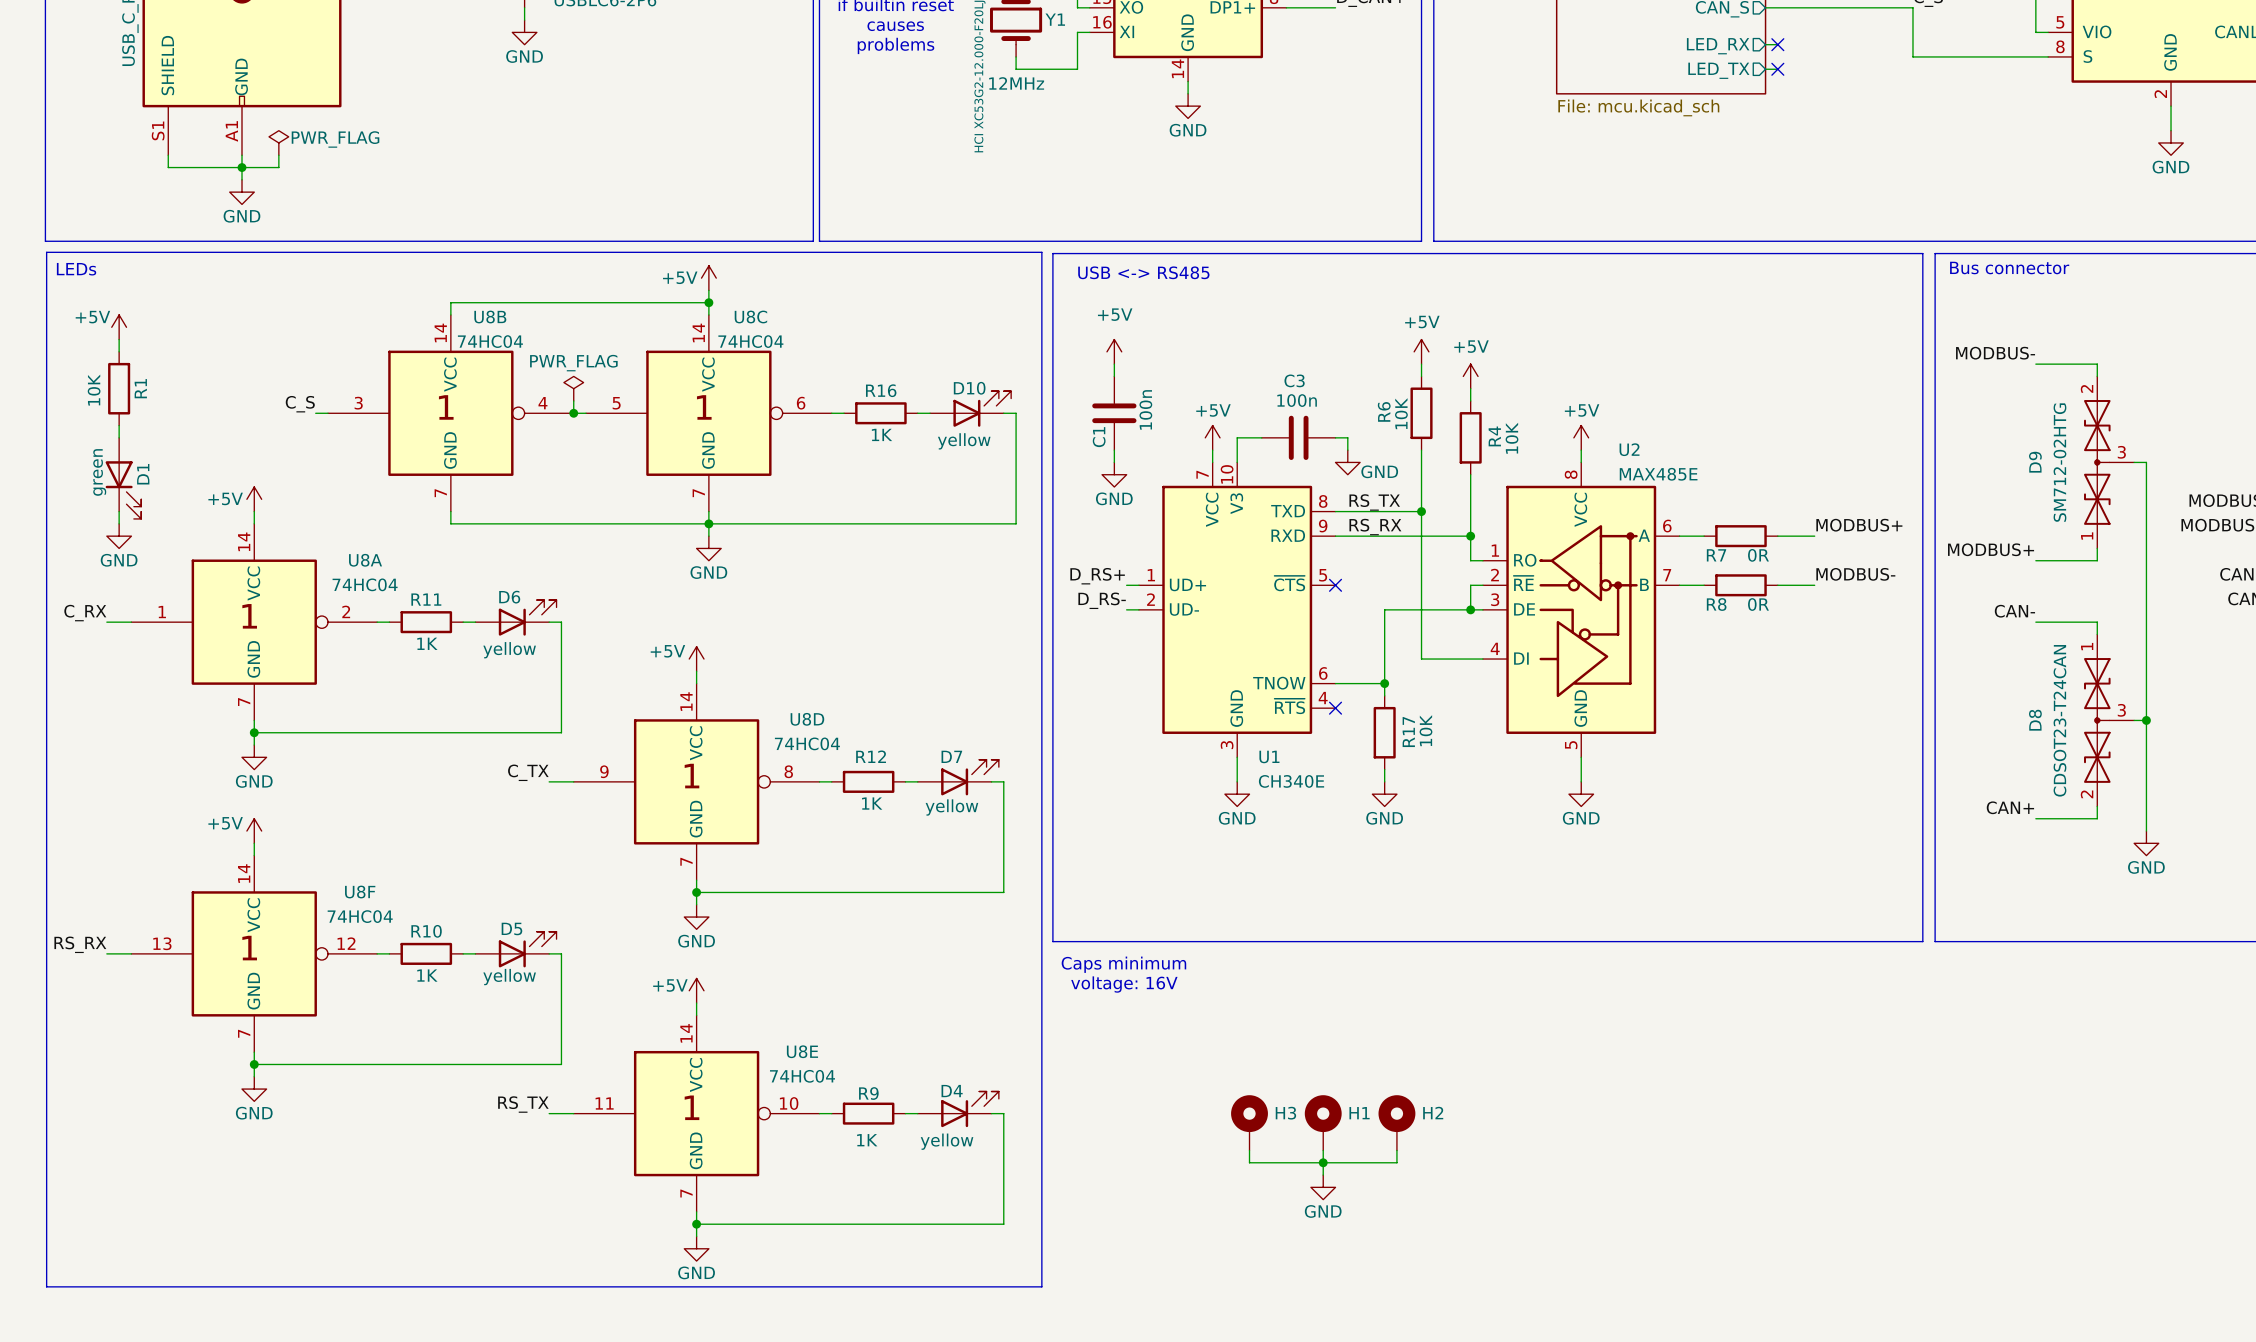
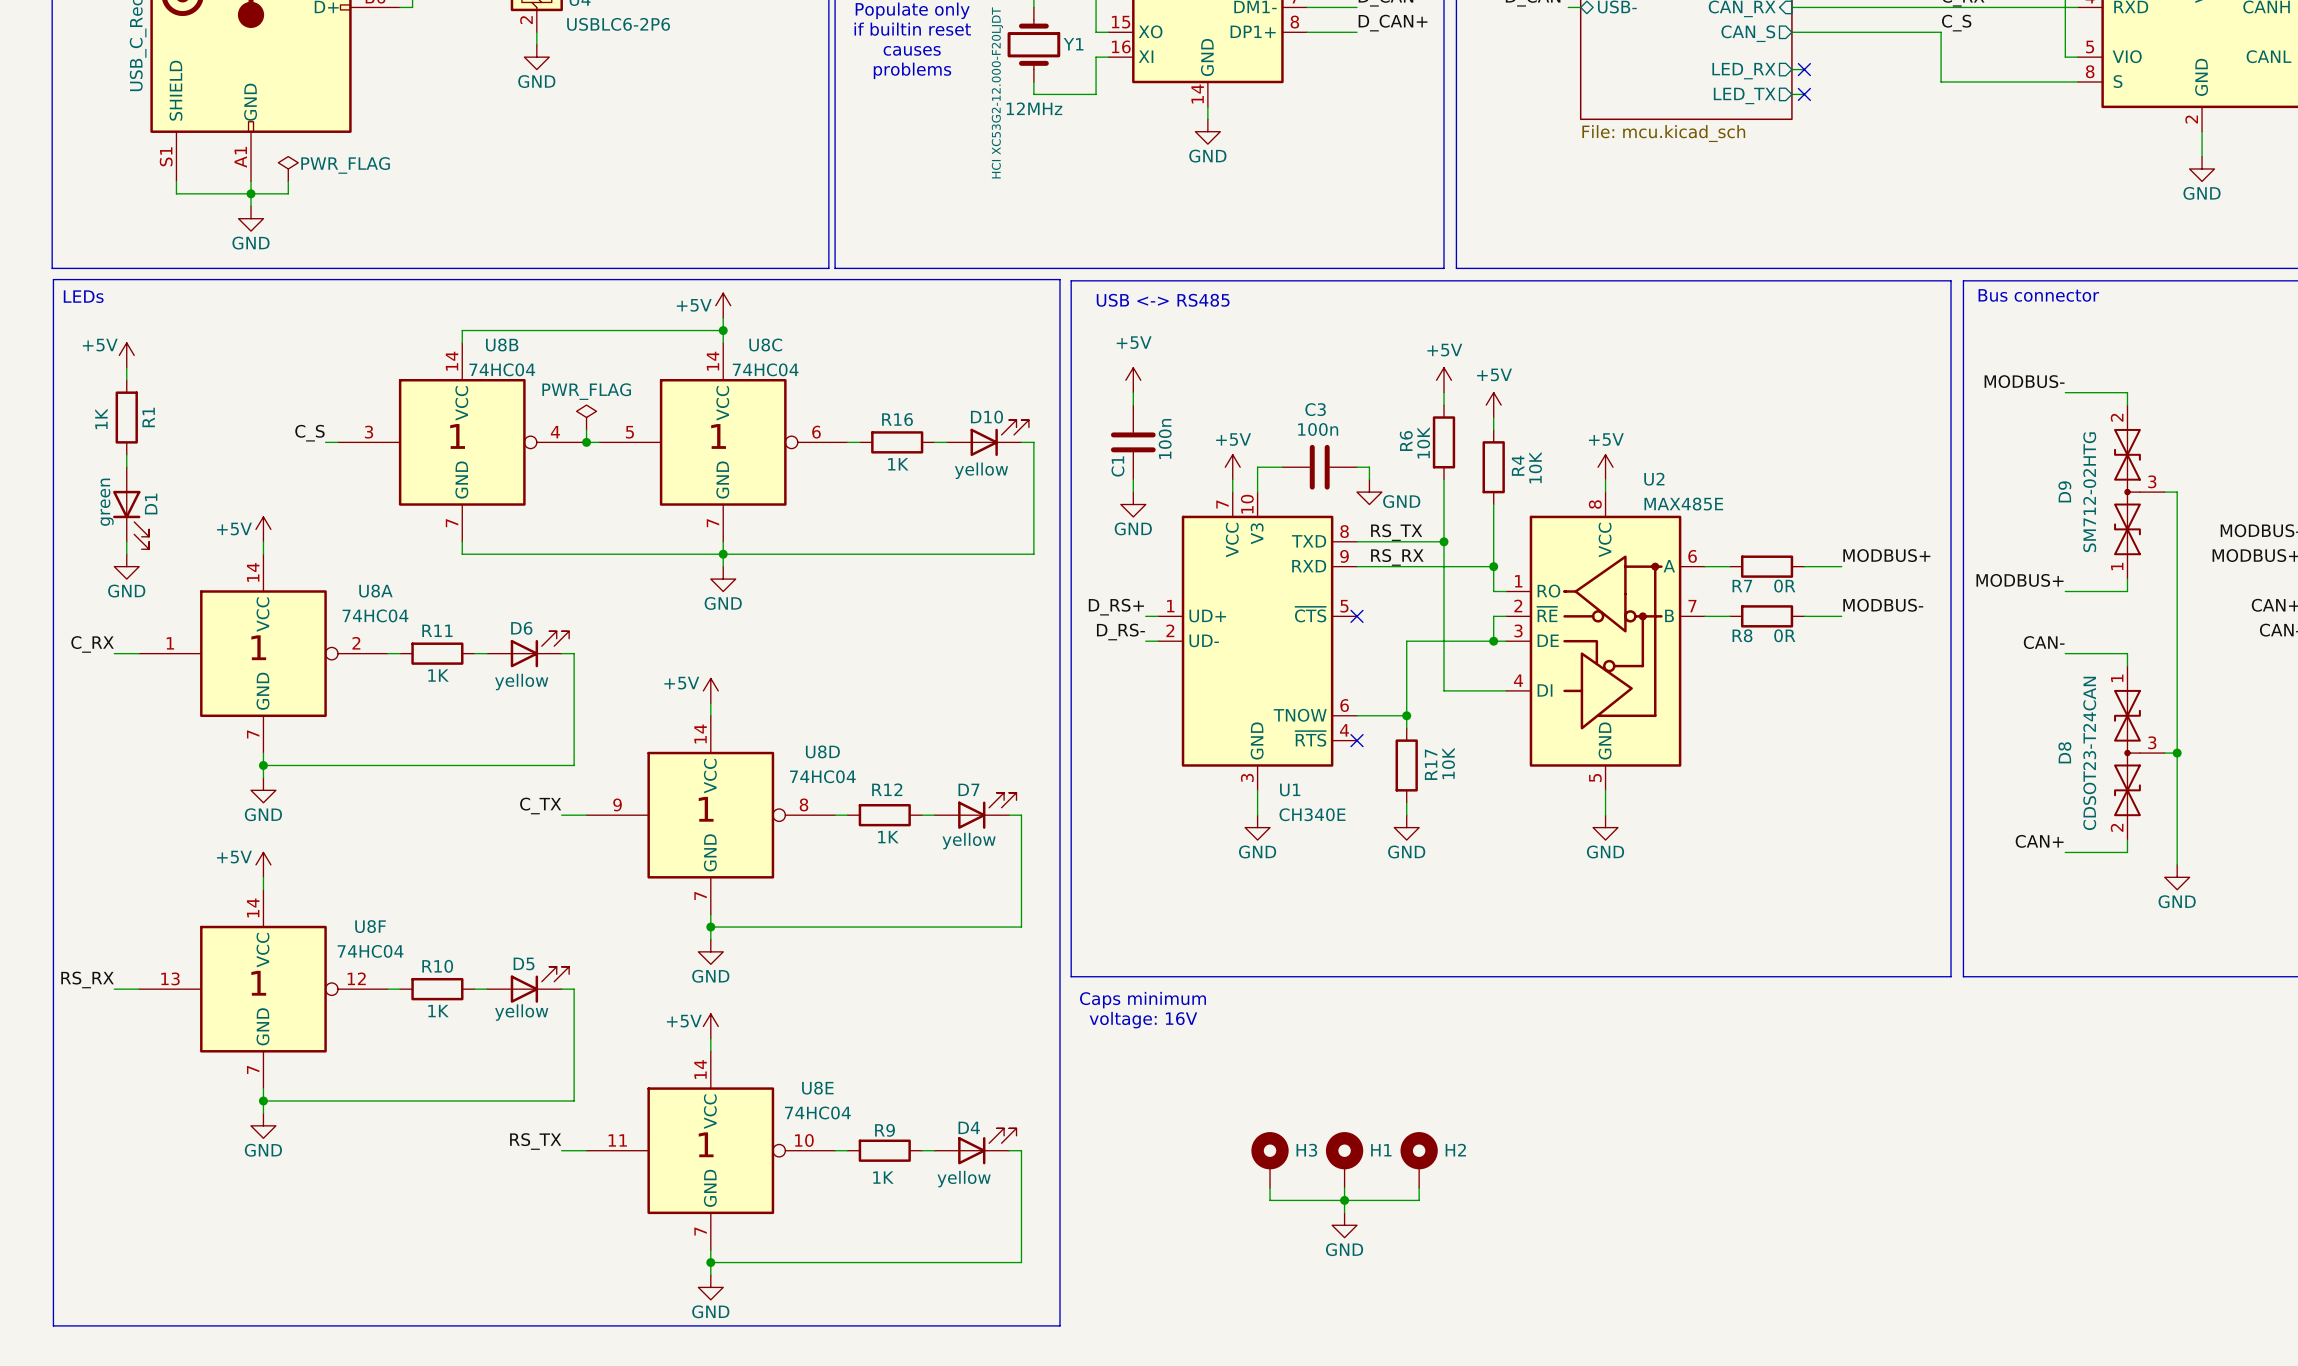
R1 value: 10K (94, 390) -> 1K (101, 418)

